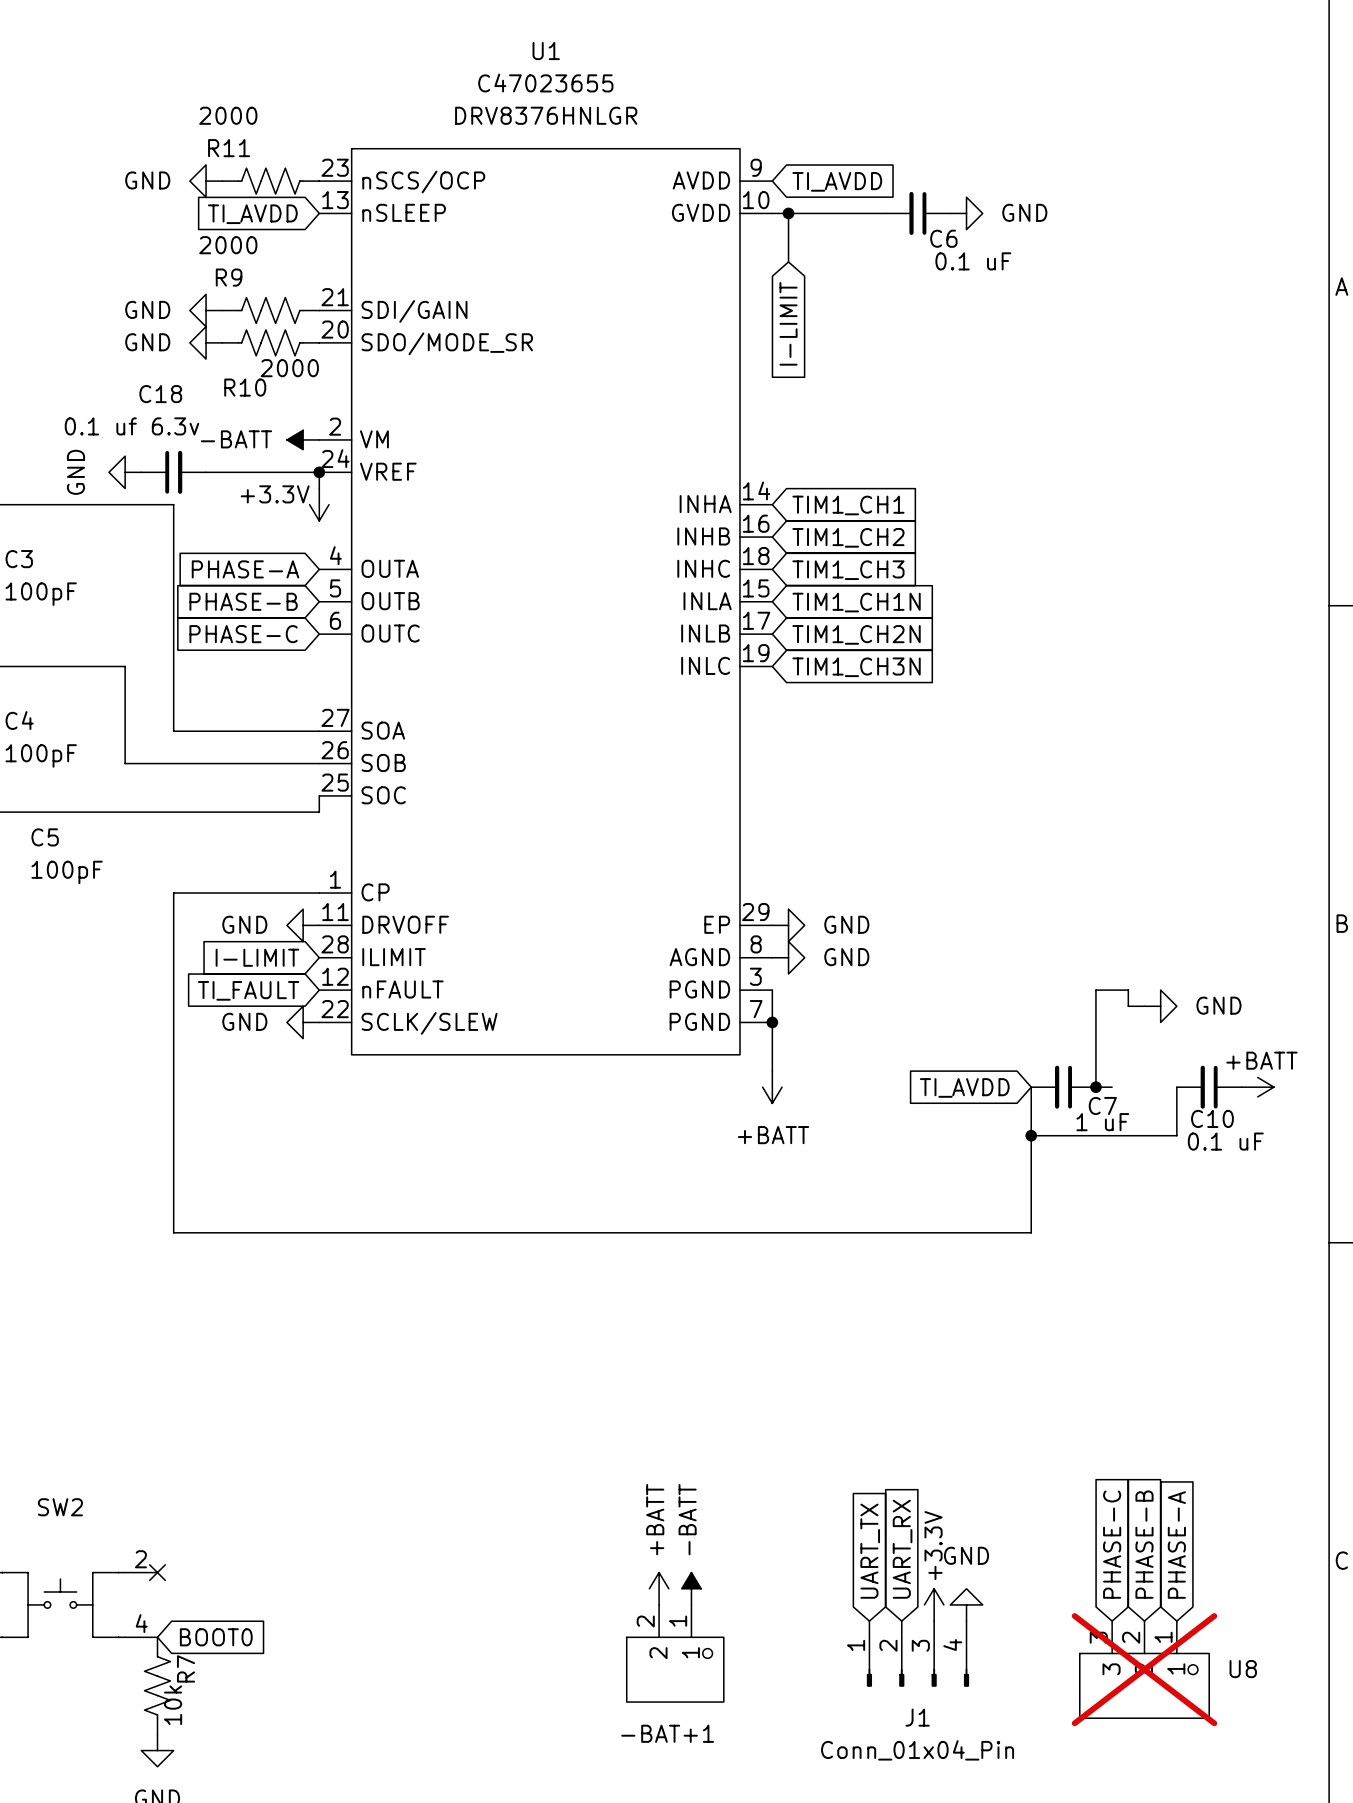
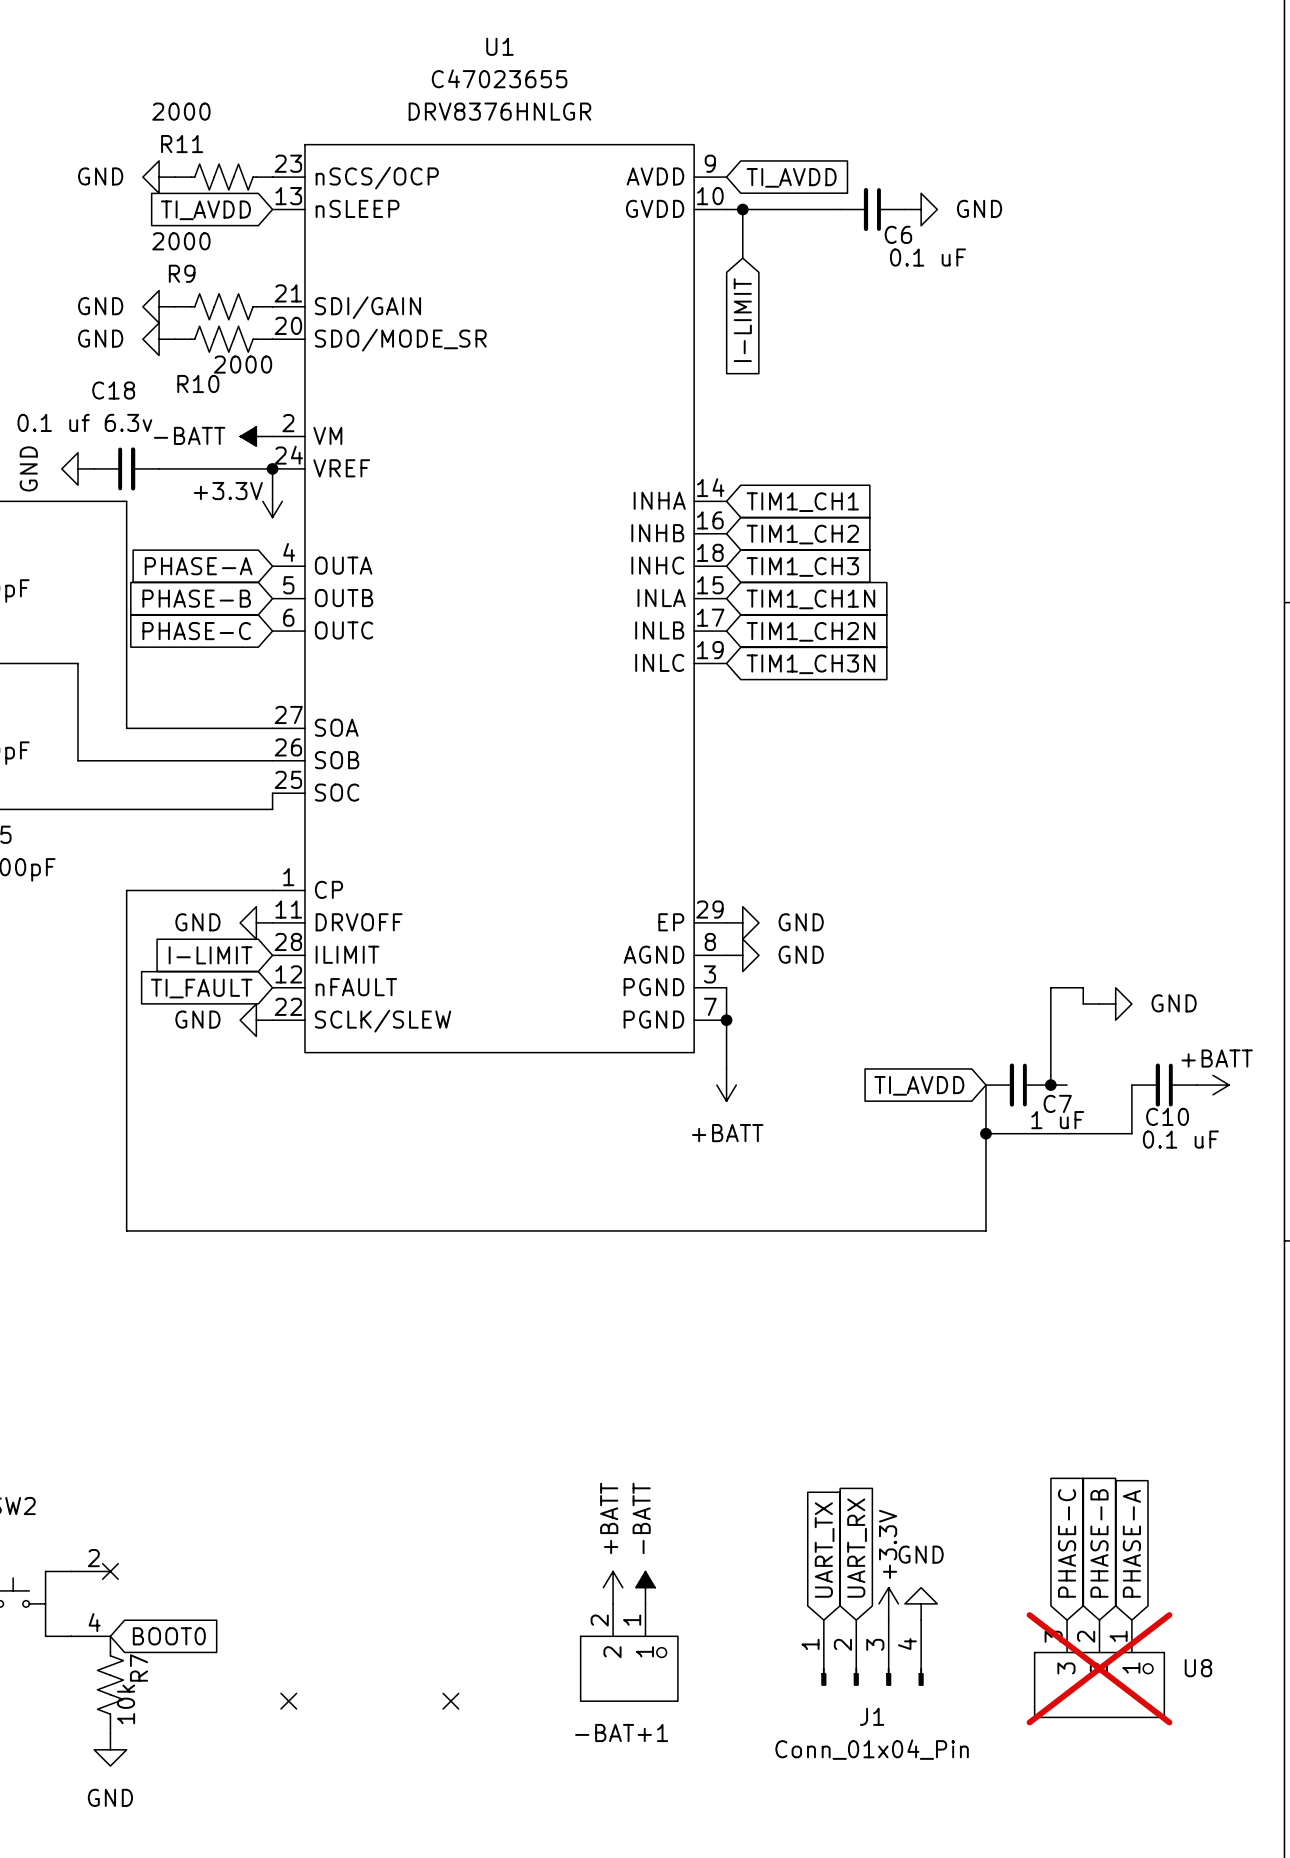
no-connect mark: none -> (288, 1701)
no-connect mark: none -> (450, 1701)

